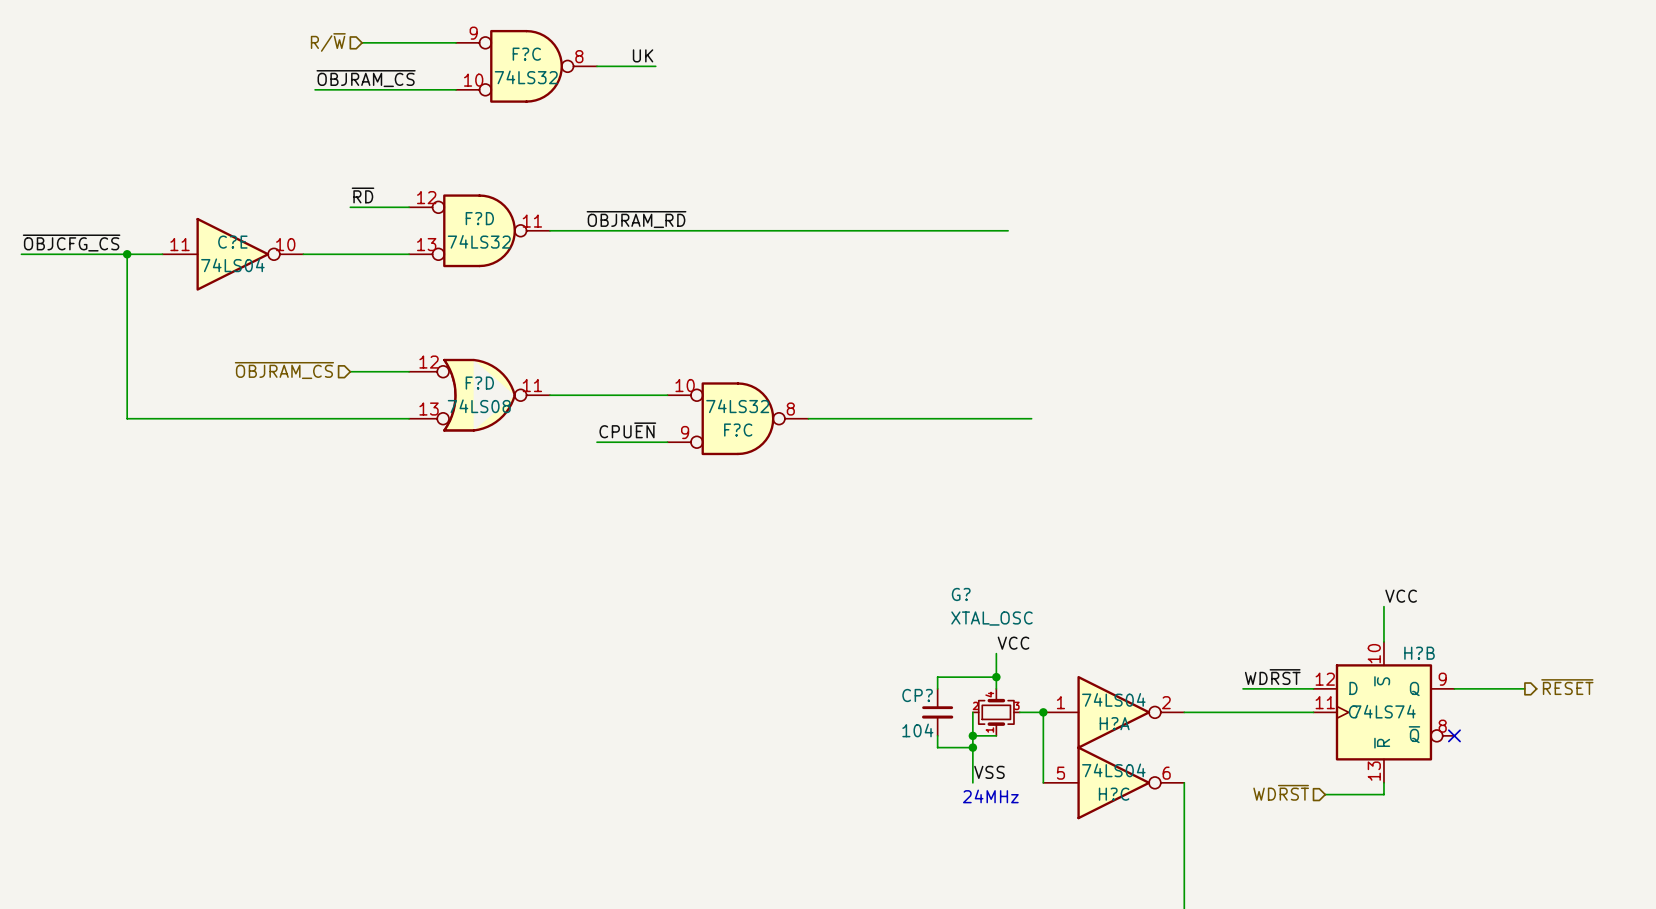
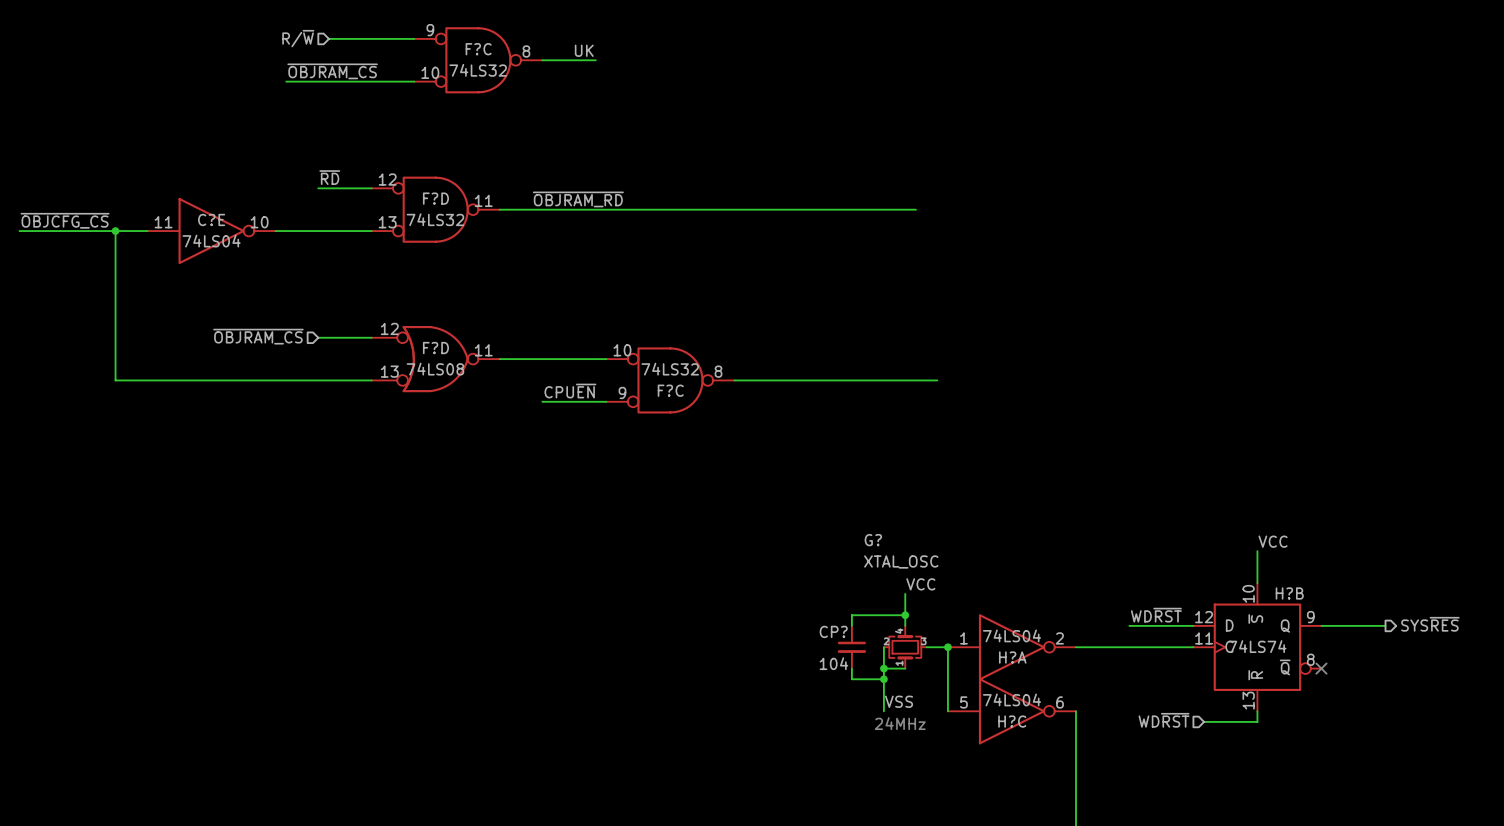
hierarchical label: ~{RESET} (1567, 687) -> SYS~{RES} (1430, 624)

